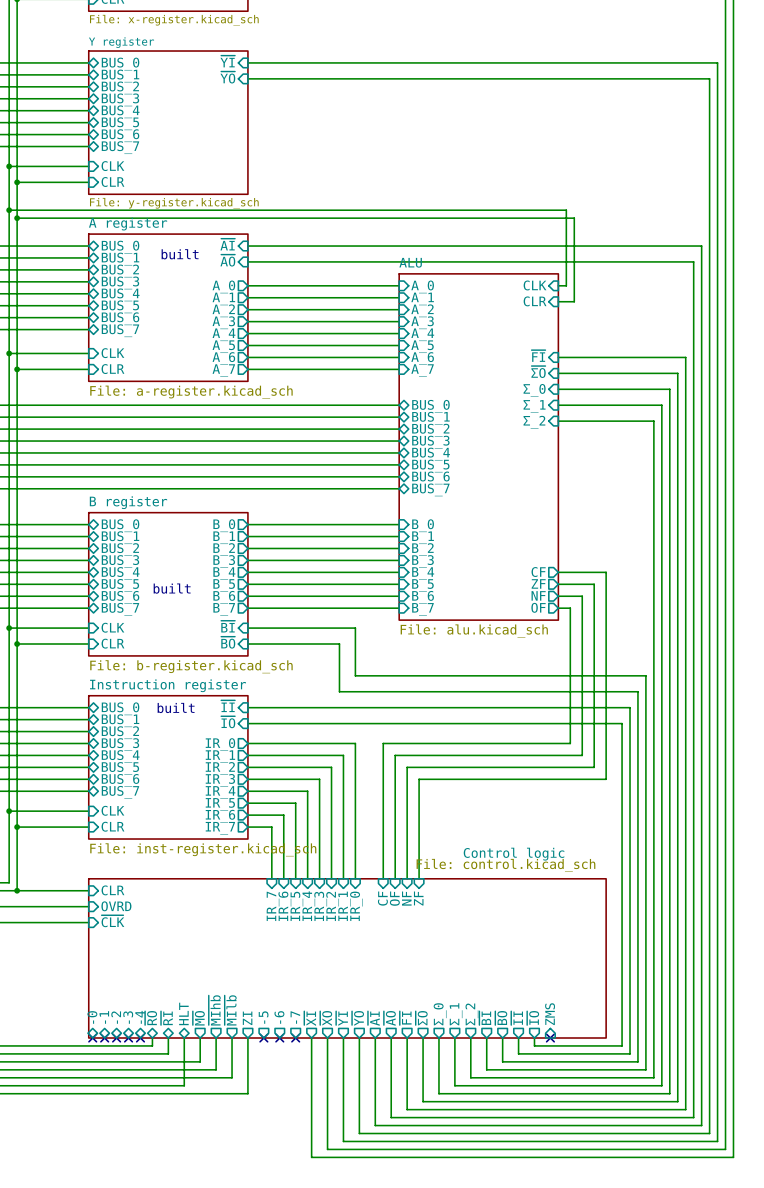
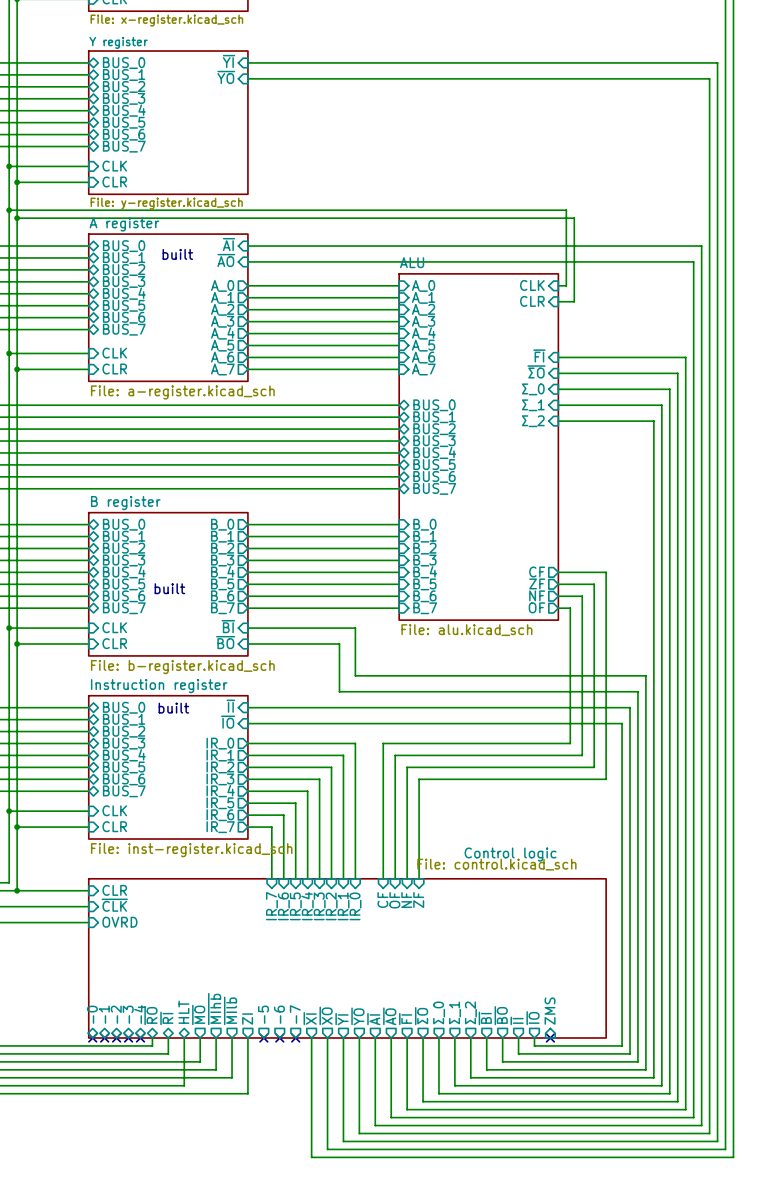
sheet pin: OVRD (116, 906) -> ~{CLK} (114, 905)
sheet pin: ~{CLK} (112, 921) -> OVRD (119, 922)

